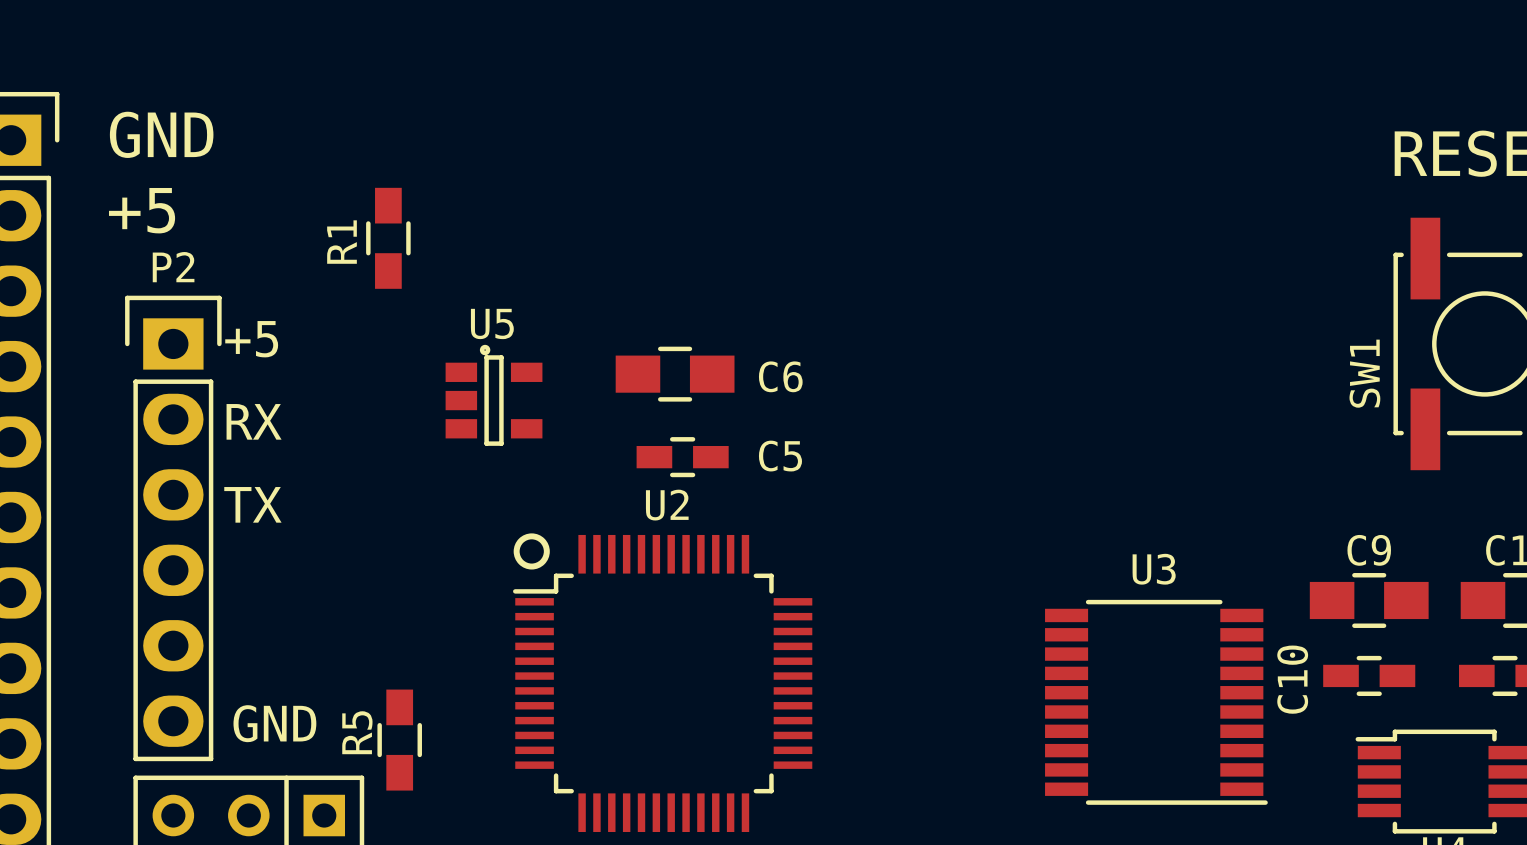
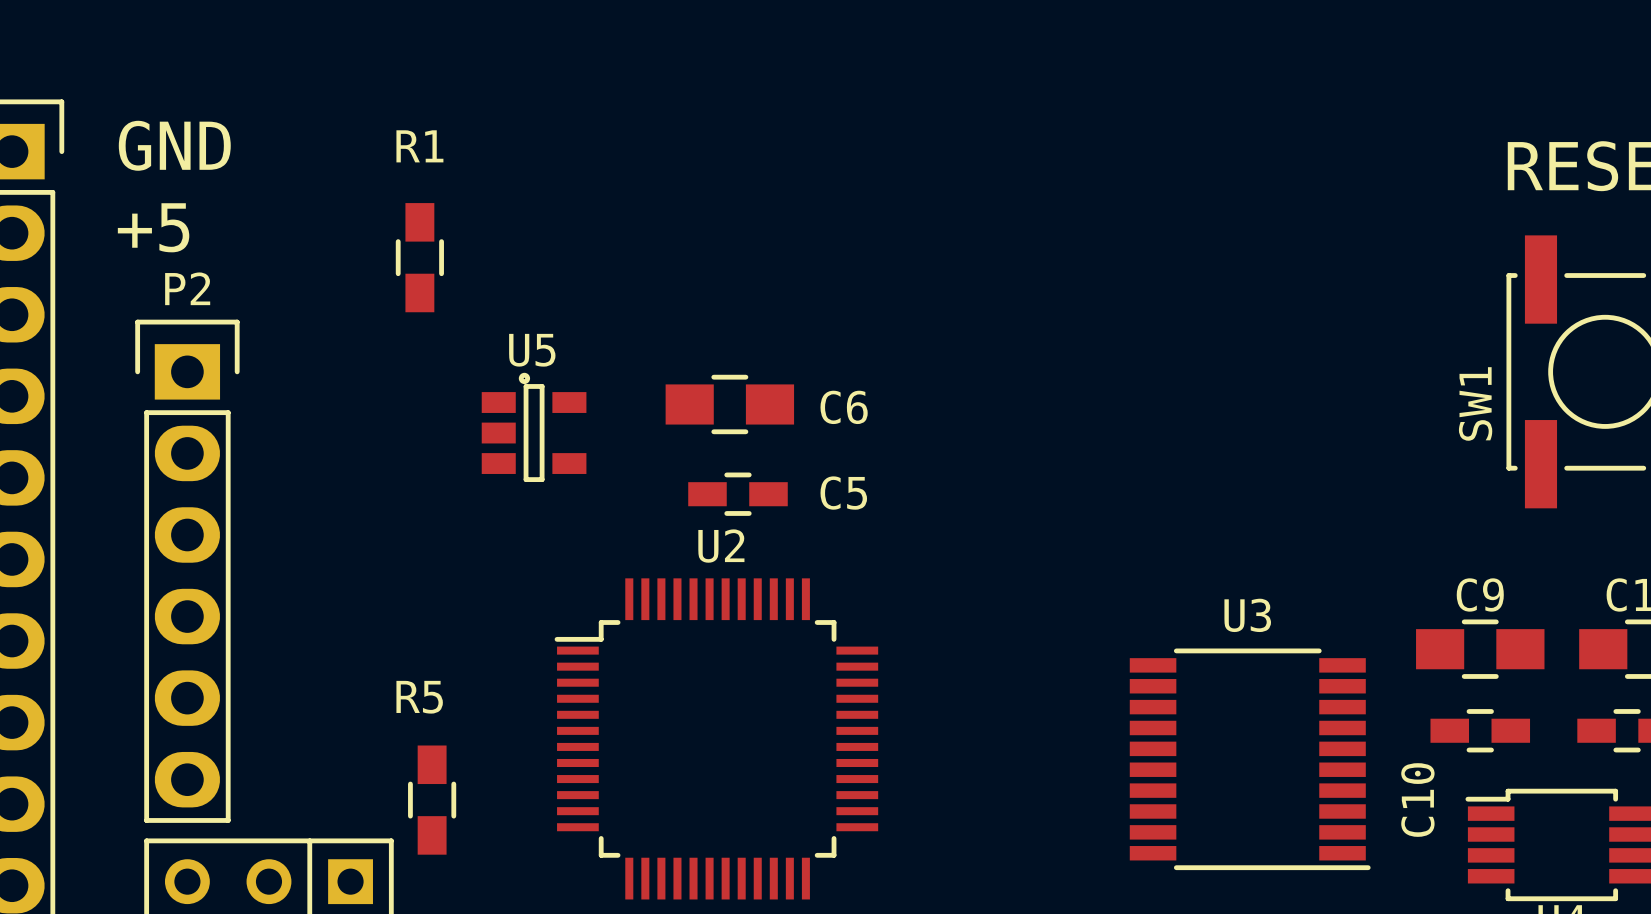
R1 name rotation: 0° (342, 242) -> 90° clockwise (419, 146)
R1 name position: R1 (342, 242) -> R1 (419, 146)
text: +5 (251, 339) -> none
text: RX (254, 421) -> none
text: TX (252, 504) -> none
drawing: [513, 533, 550, 570] -> none
C10 name position: C10 (1292, 679) -> C10 (1417, 800)
text: GND (274, 723) -> none
R5 name rotation: 0° (357, 732) -> 90° clockwise (419, 697)
R5 name position: R5 (357, 732) -> R5 (419, 697)

